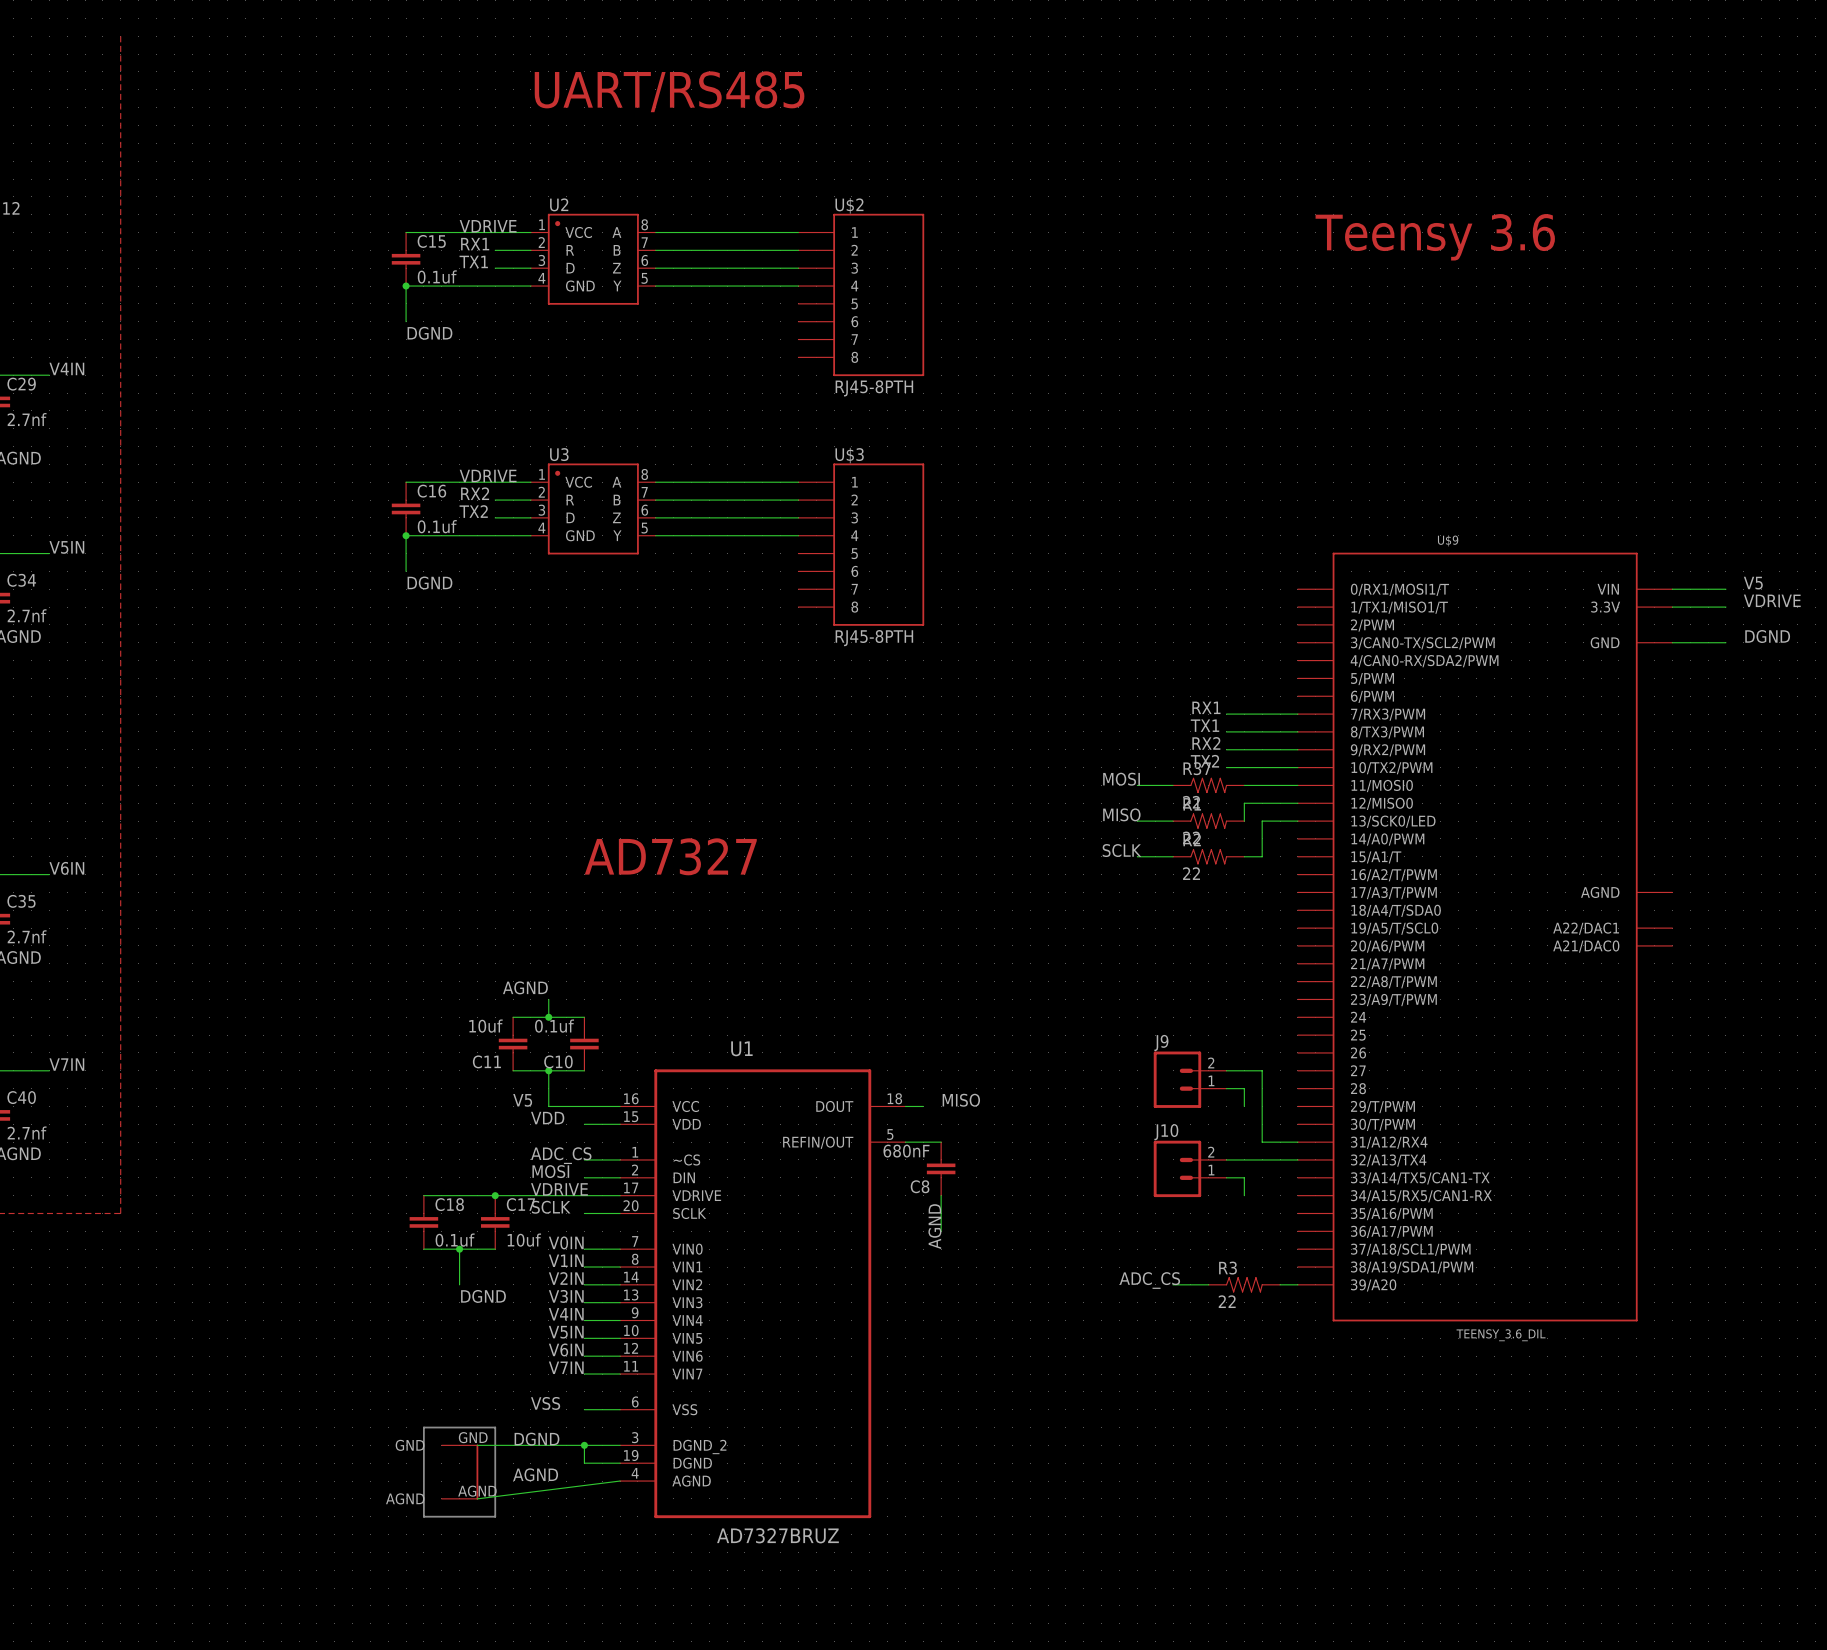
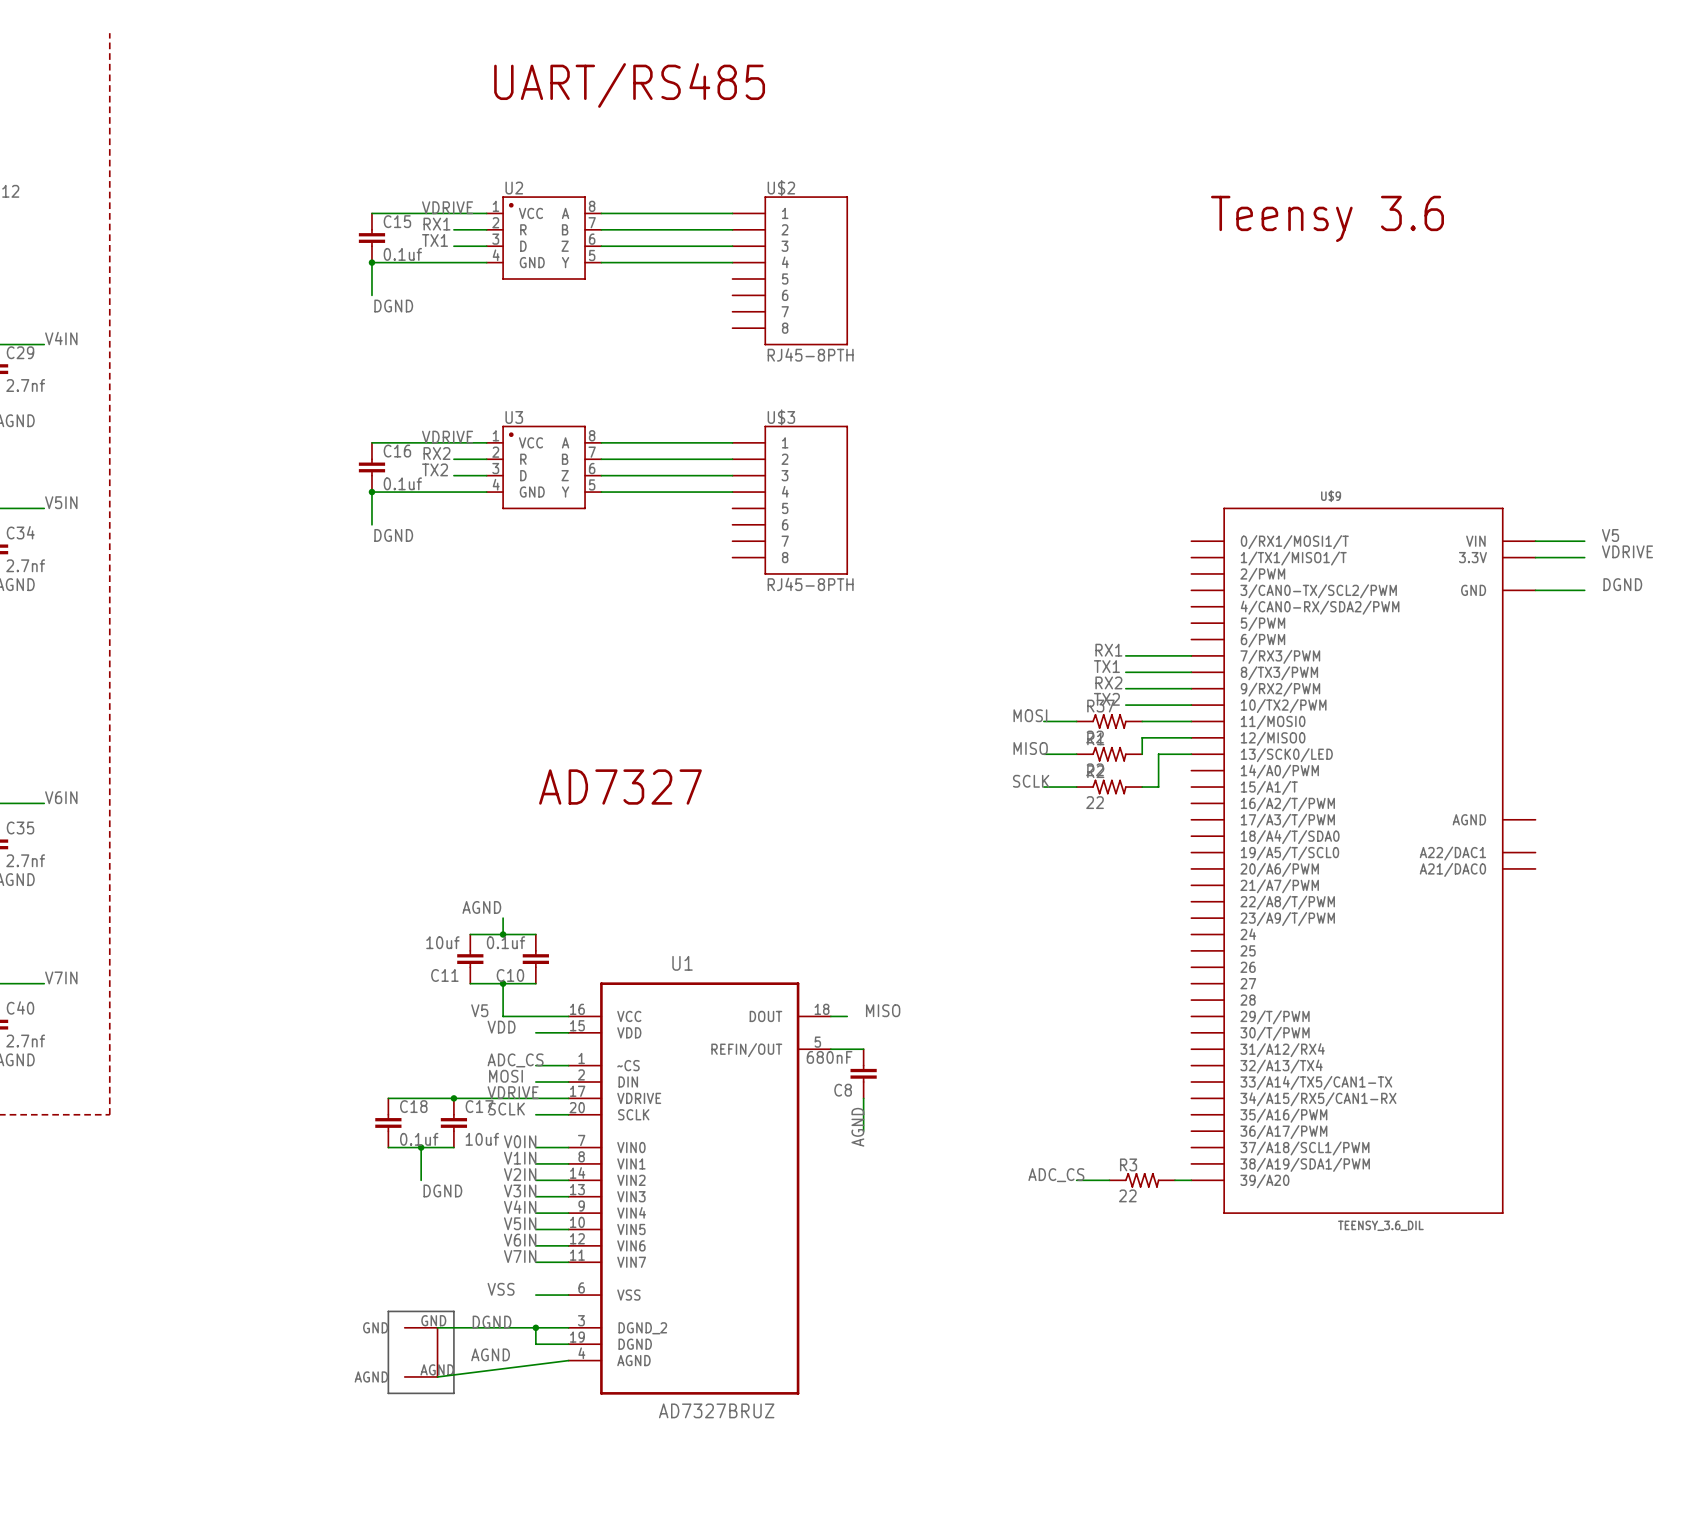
wire: (1226, 1070) (1262, 1070) (1262, 1142) (1297, 1142) -> none
J9: (1190, 1079) -> none
wire: (1226, 1088) (1244, 1088) (1244, 1106) -> none
wire: (1226, 1159) (1297, 1159) -> none
J10: (1190, 1168) -> none
wire: (1226, 1177) (1244, 1177) (1244, 1195) -> none

